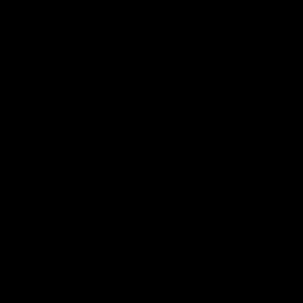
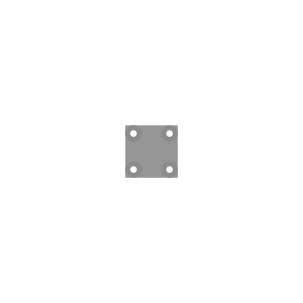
part: none -> (151, 151)

